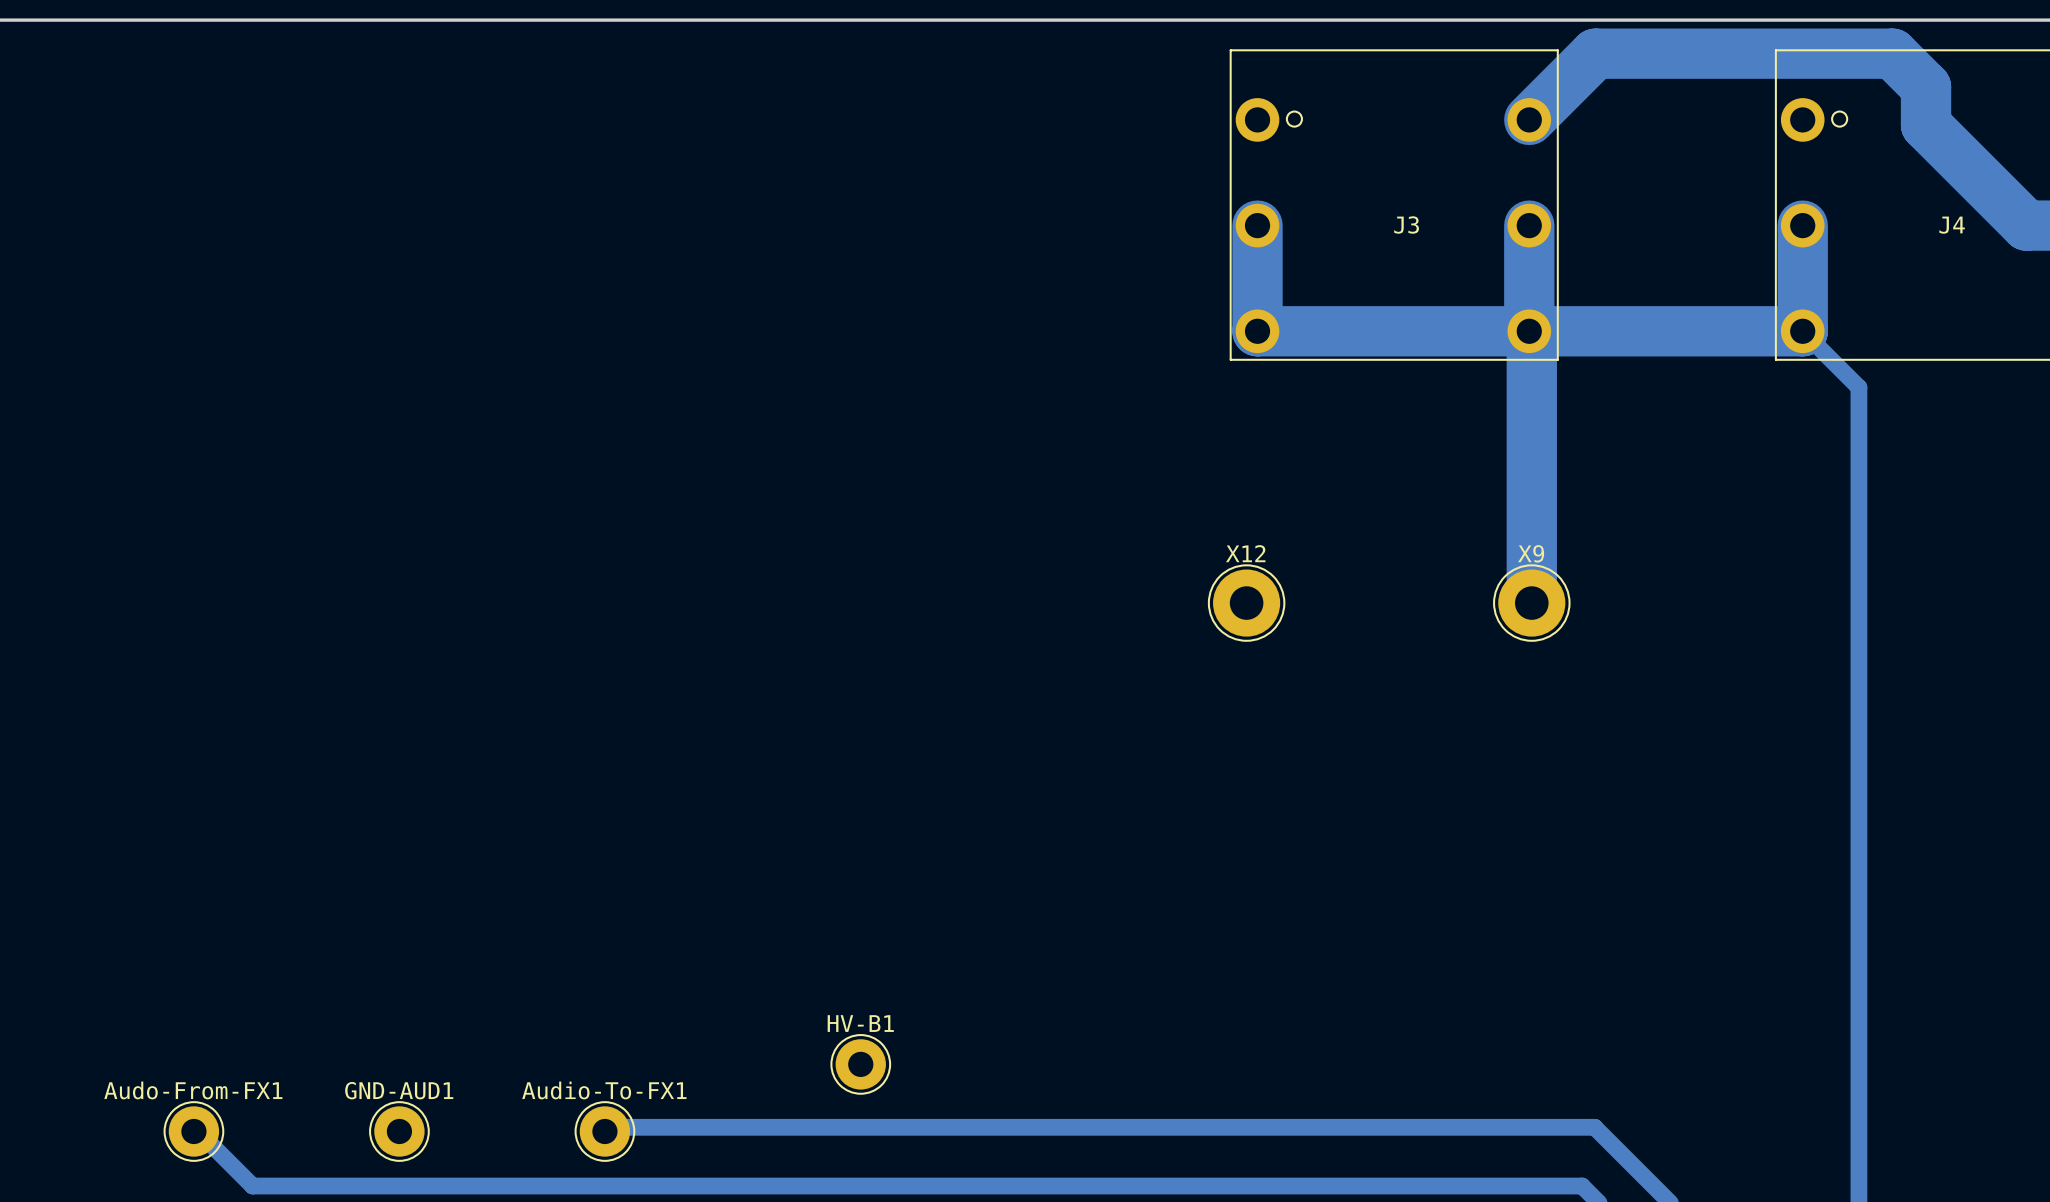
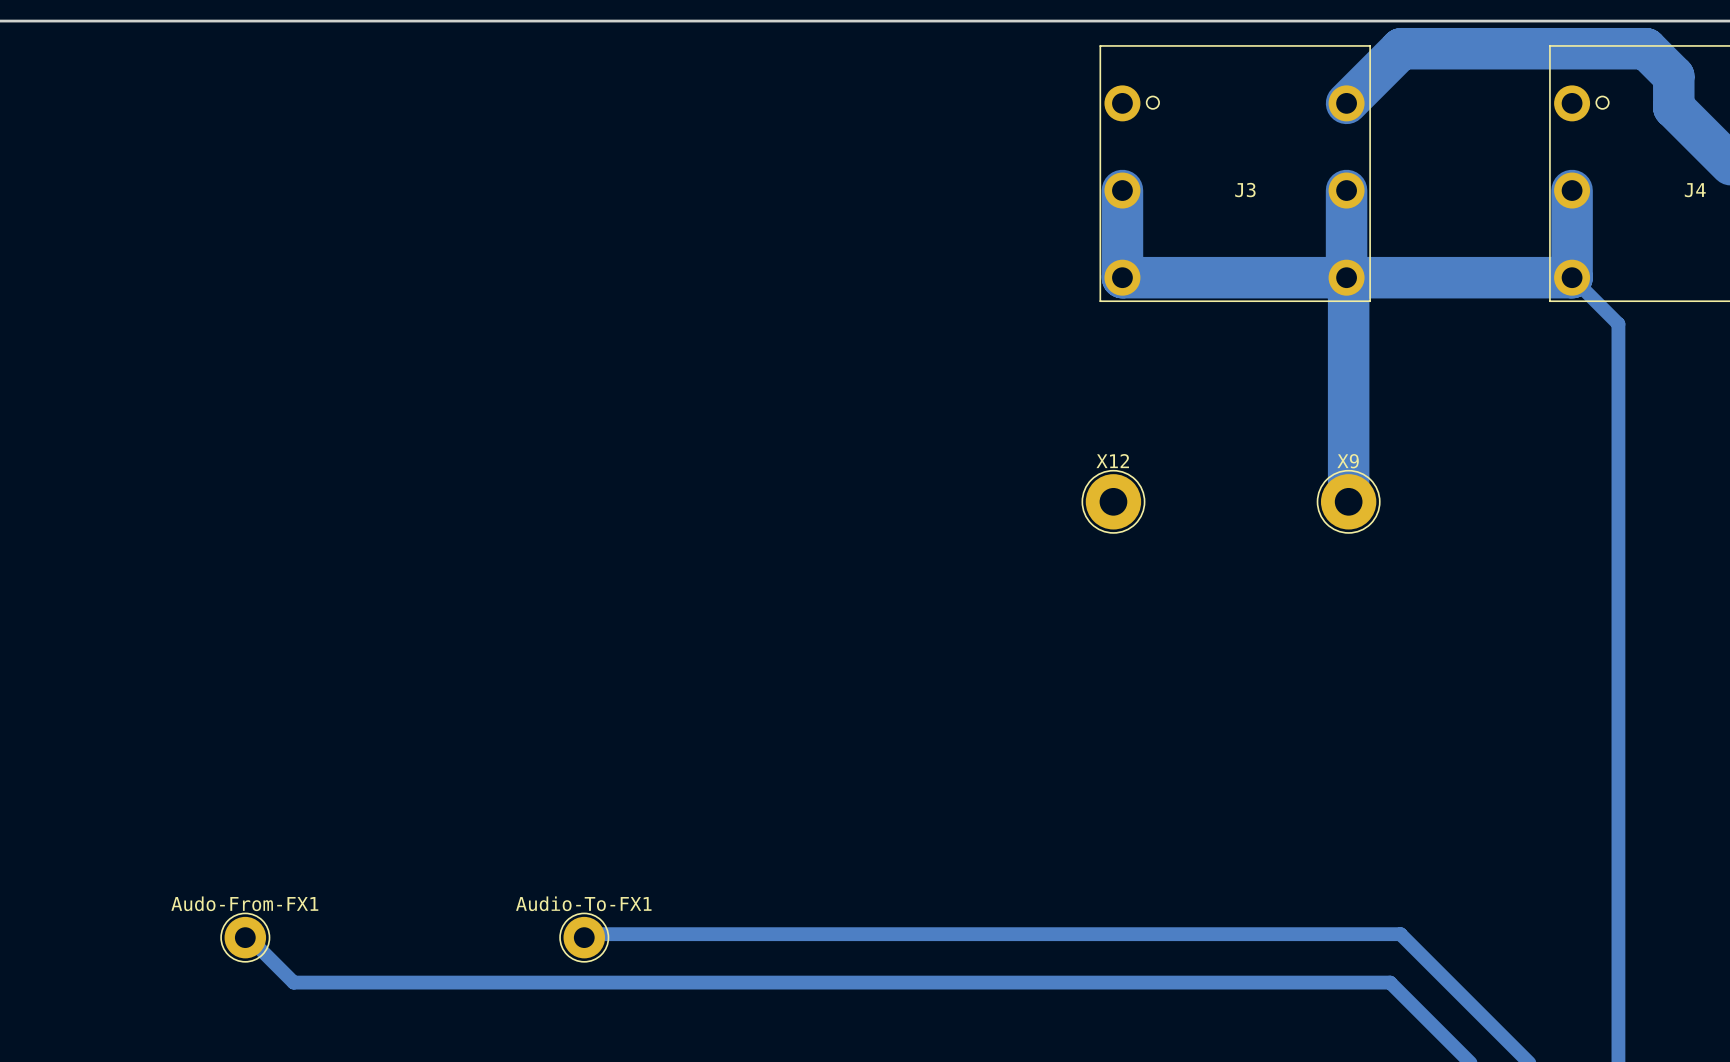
HV-B1: (860, 1064) -> none
GND-AUD1: (399, 1131) -> none

